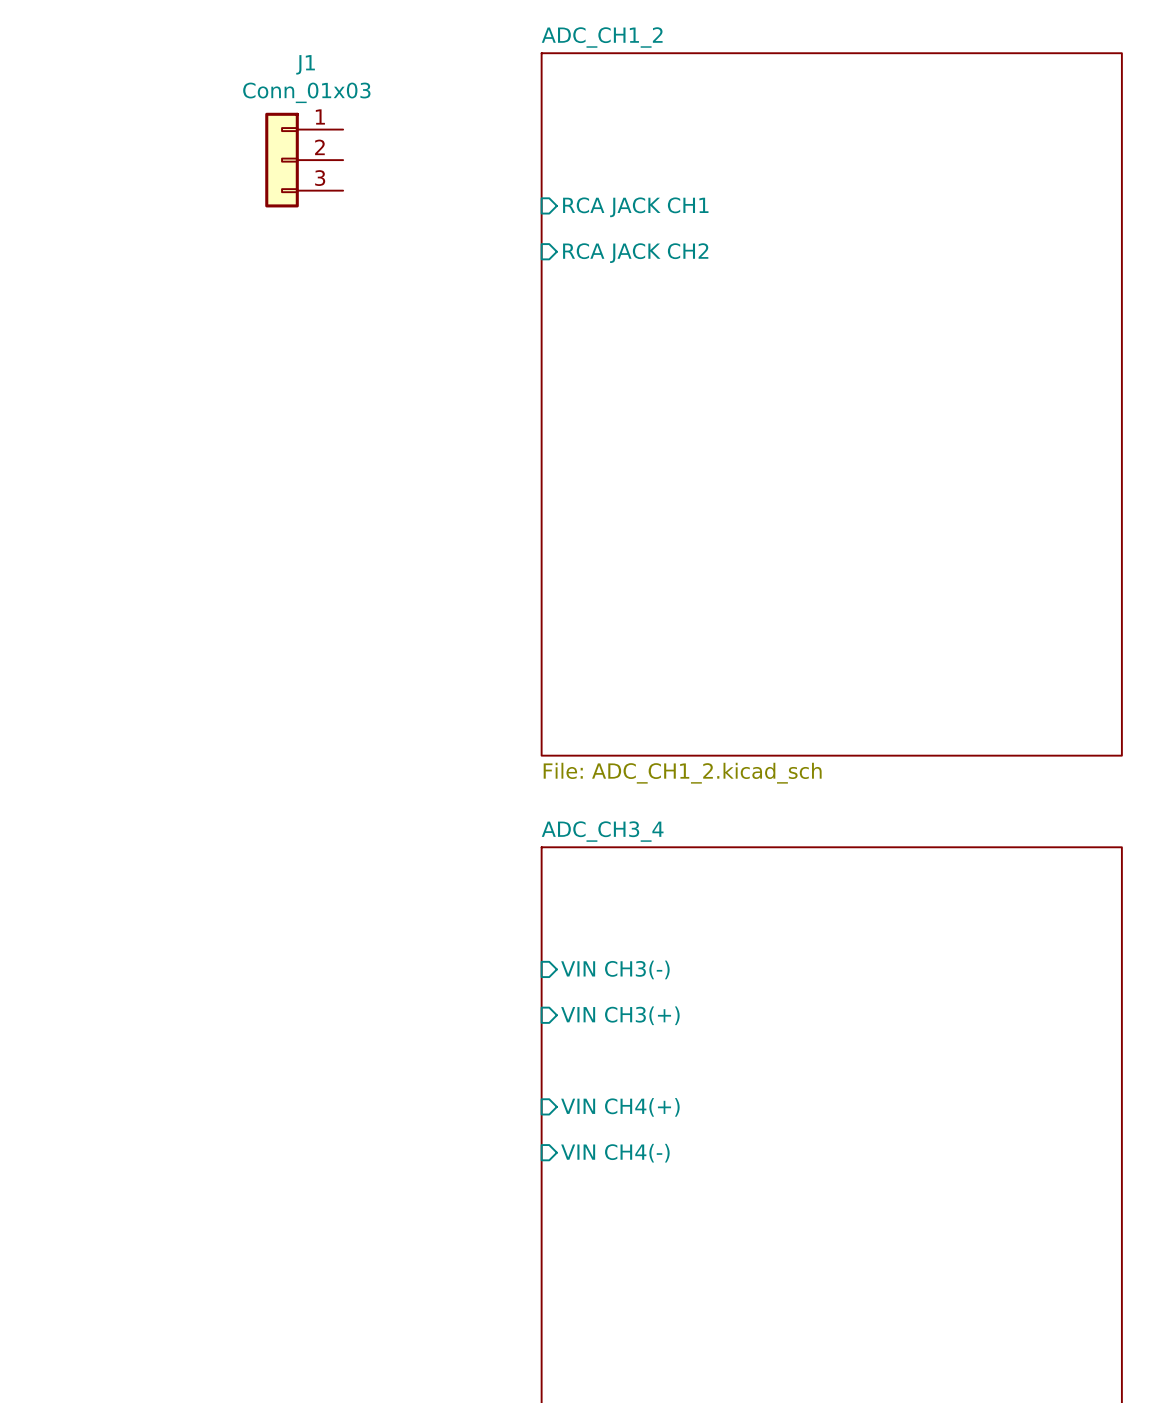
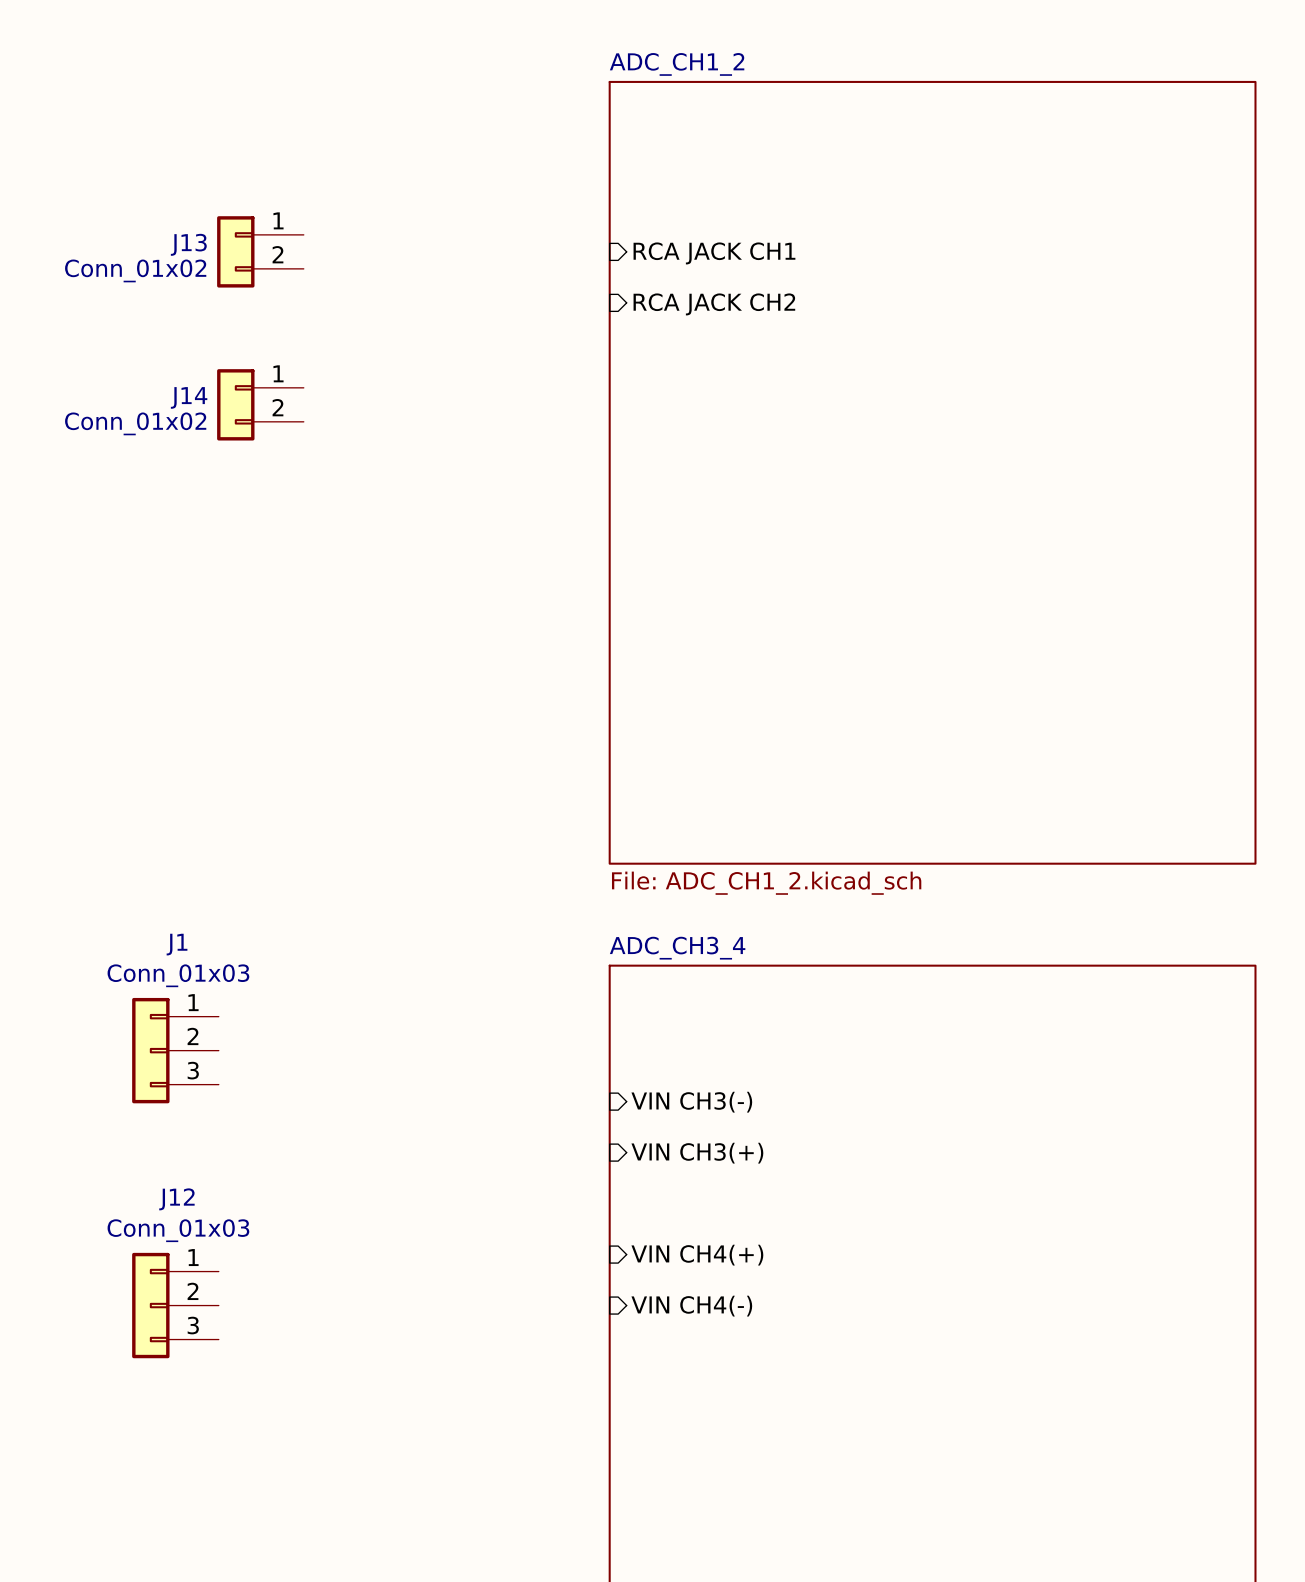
J1 position: (304, 160) -> (175, 1050)
J13: none -> Conn_01x02 (260, 251)
J14: none -> Conn_01x02 (260, 404)
J12: none -> Conn_01x03 (175, 1305)

